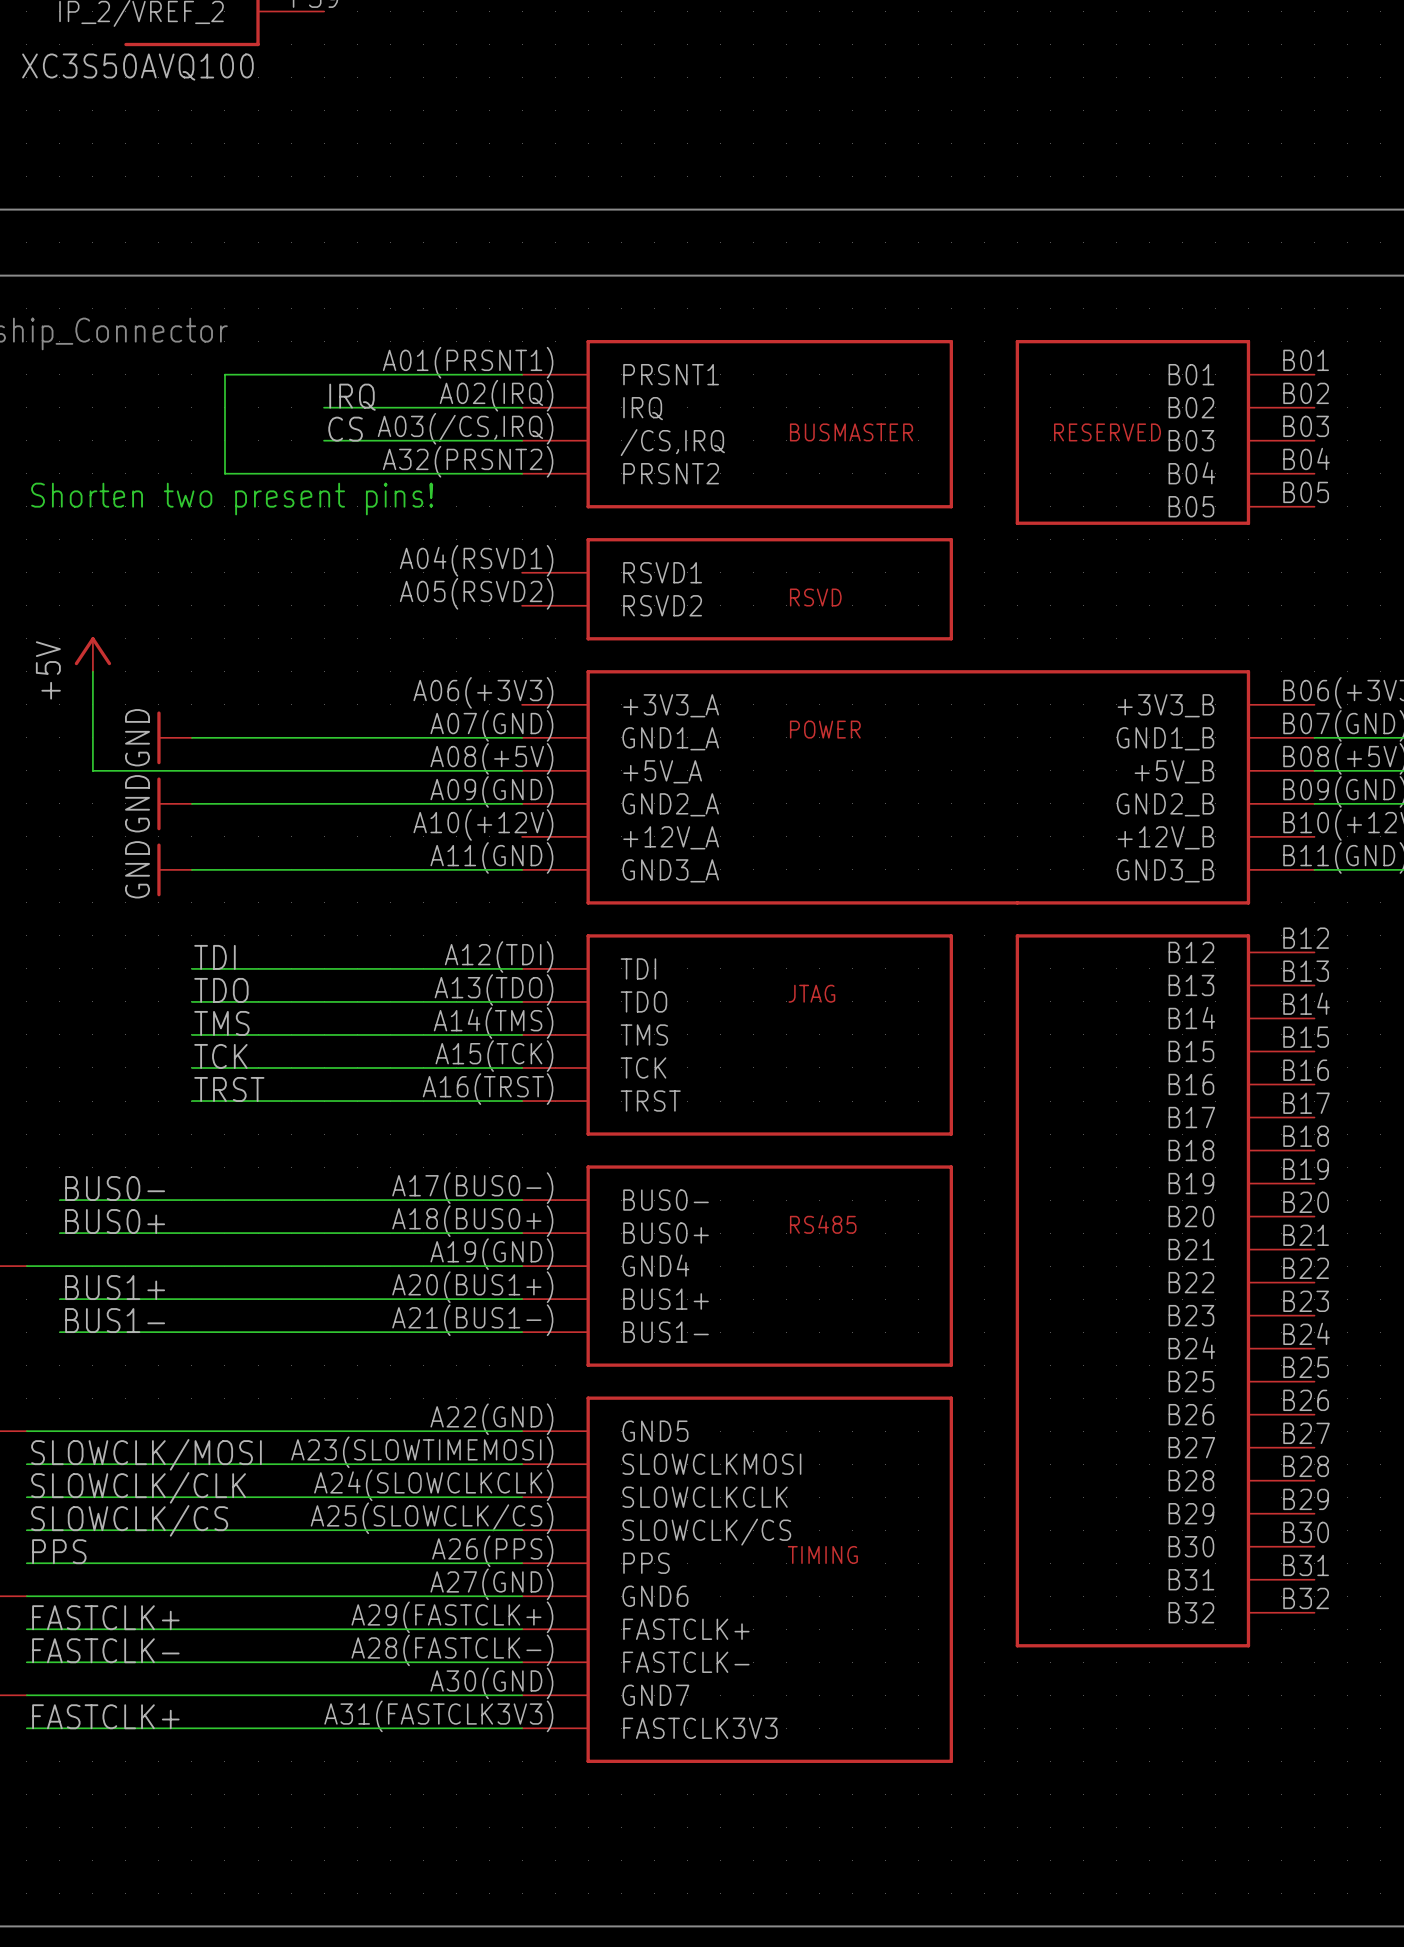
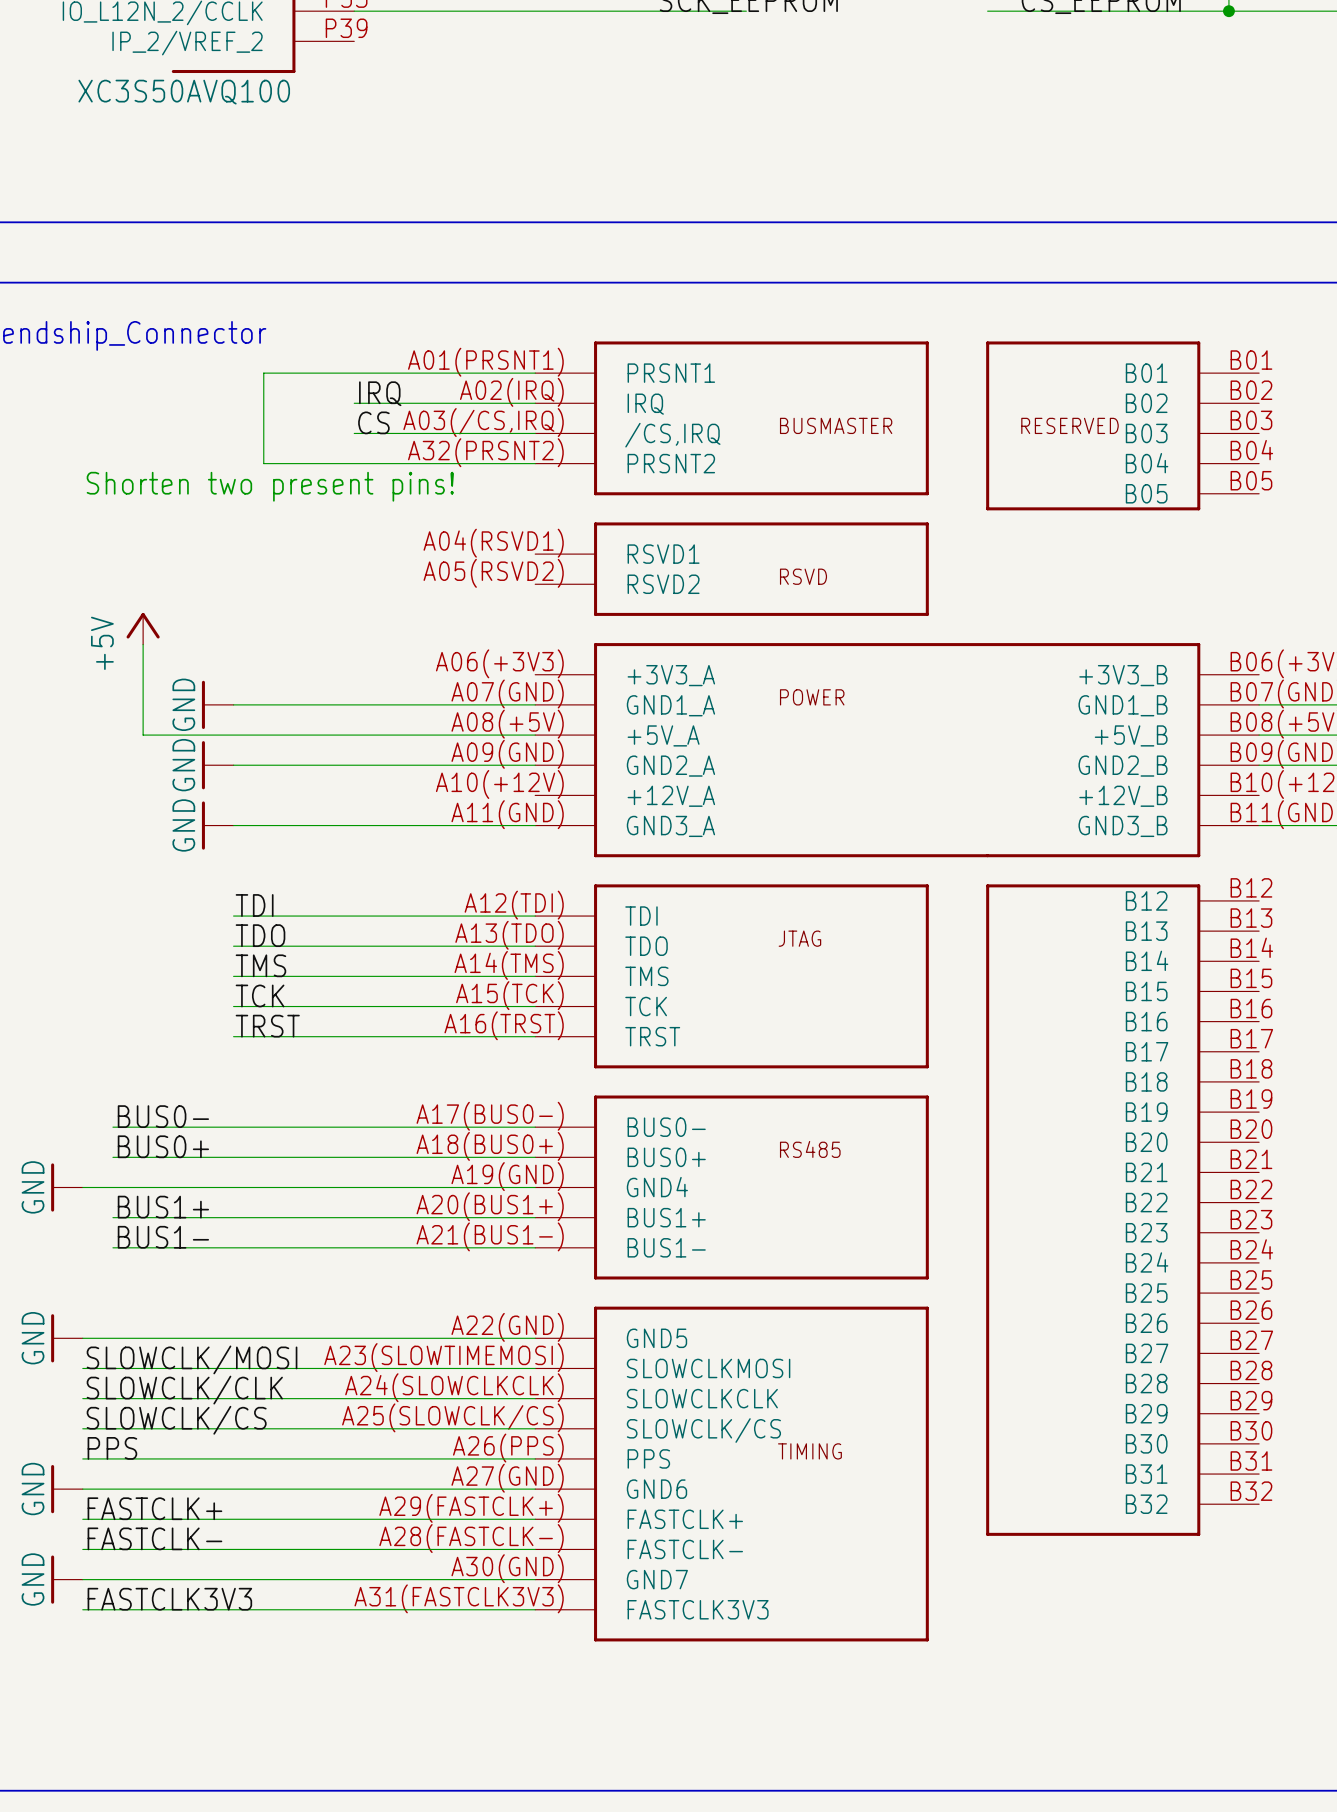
label: FASTCLK+ (105, 1716) -> FASTCLK3V3 (169, 1599)

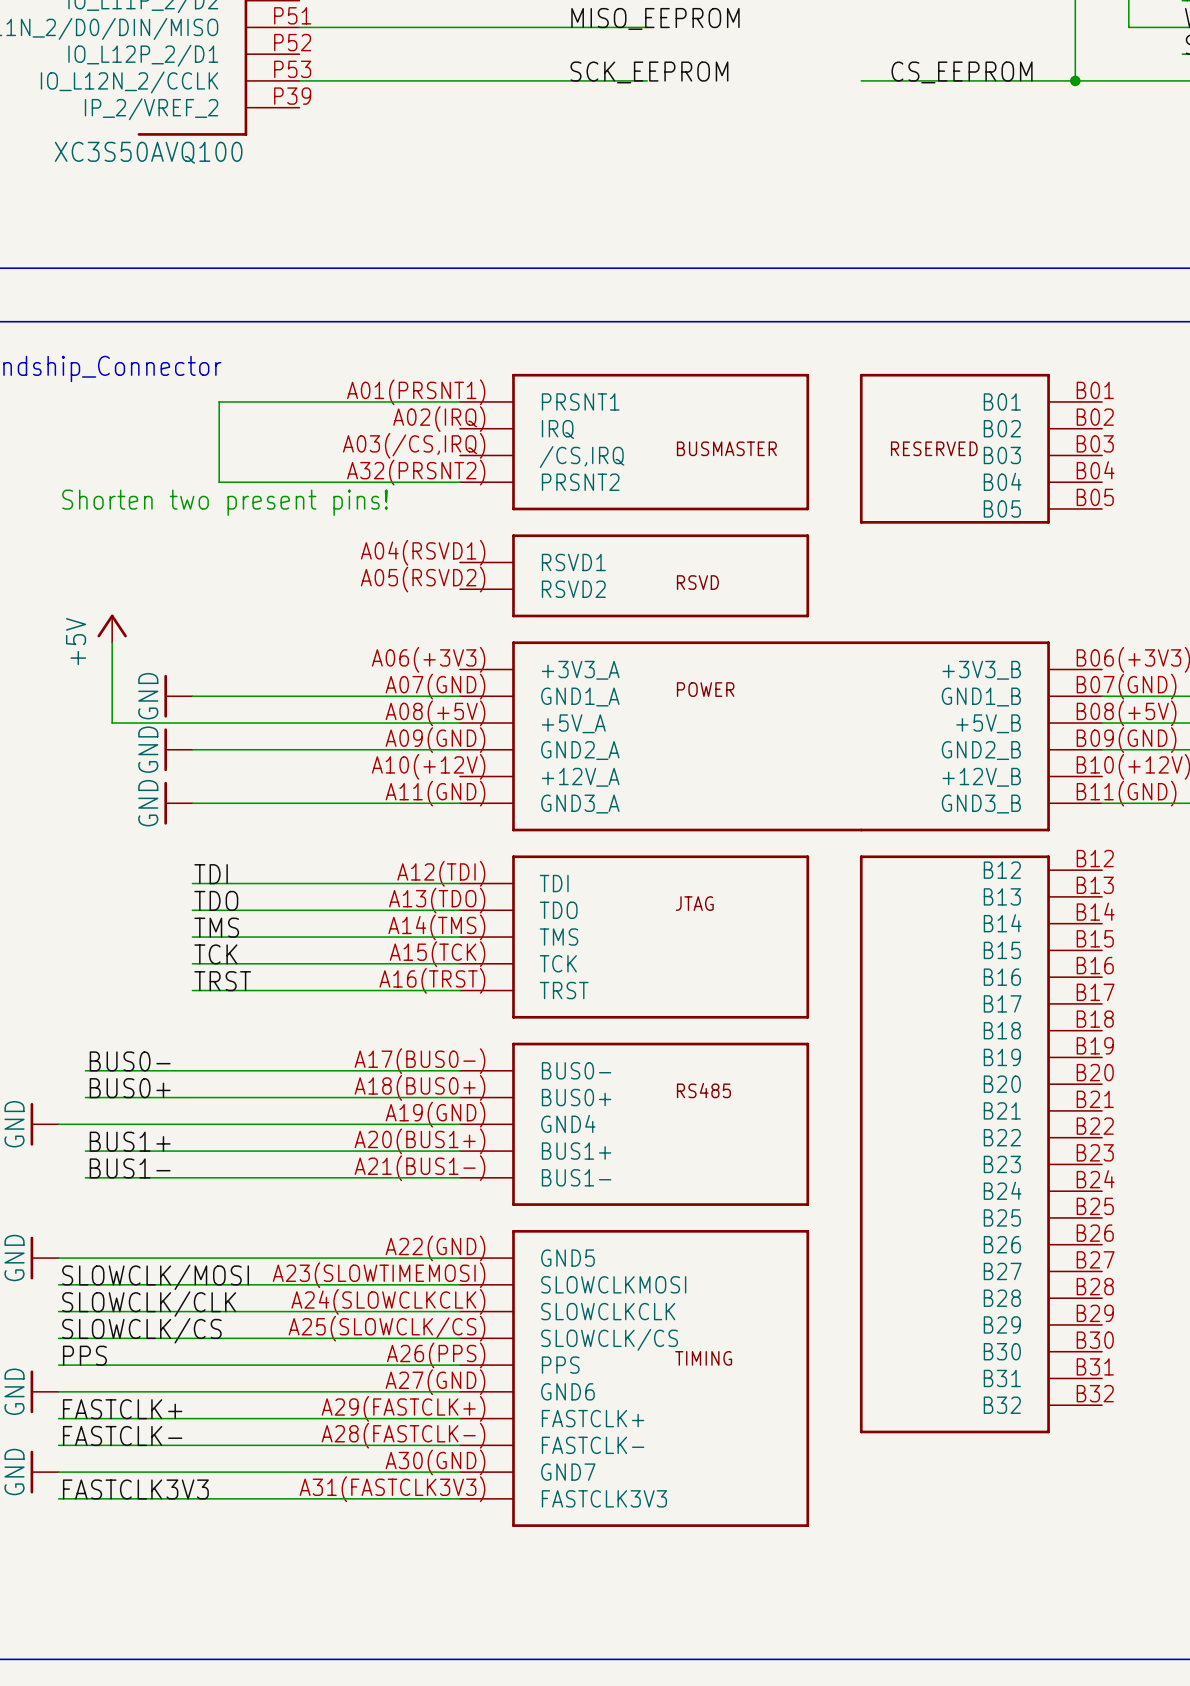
label: IRQ (380, 393) -> none
wire: (354, 403) (535, 403) -> none
label: CS (373, 422) -> none
wire: (354, 433) (535, 433) -> none

